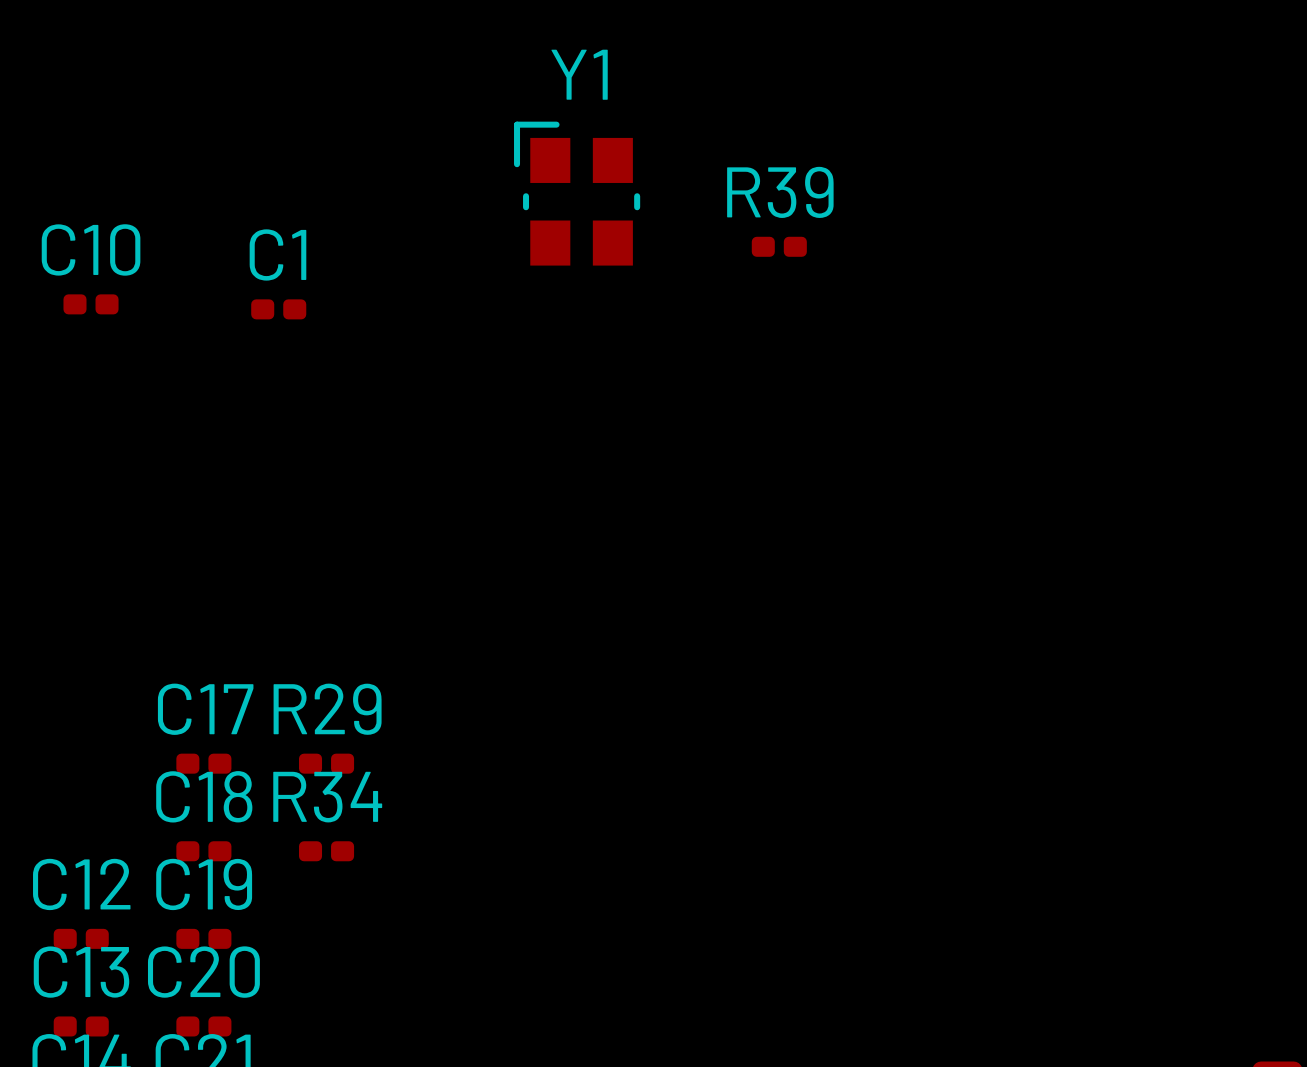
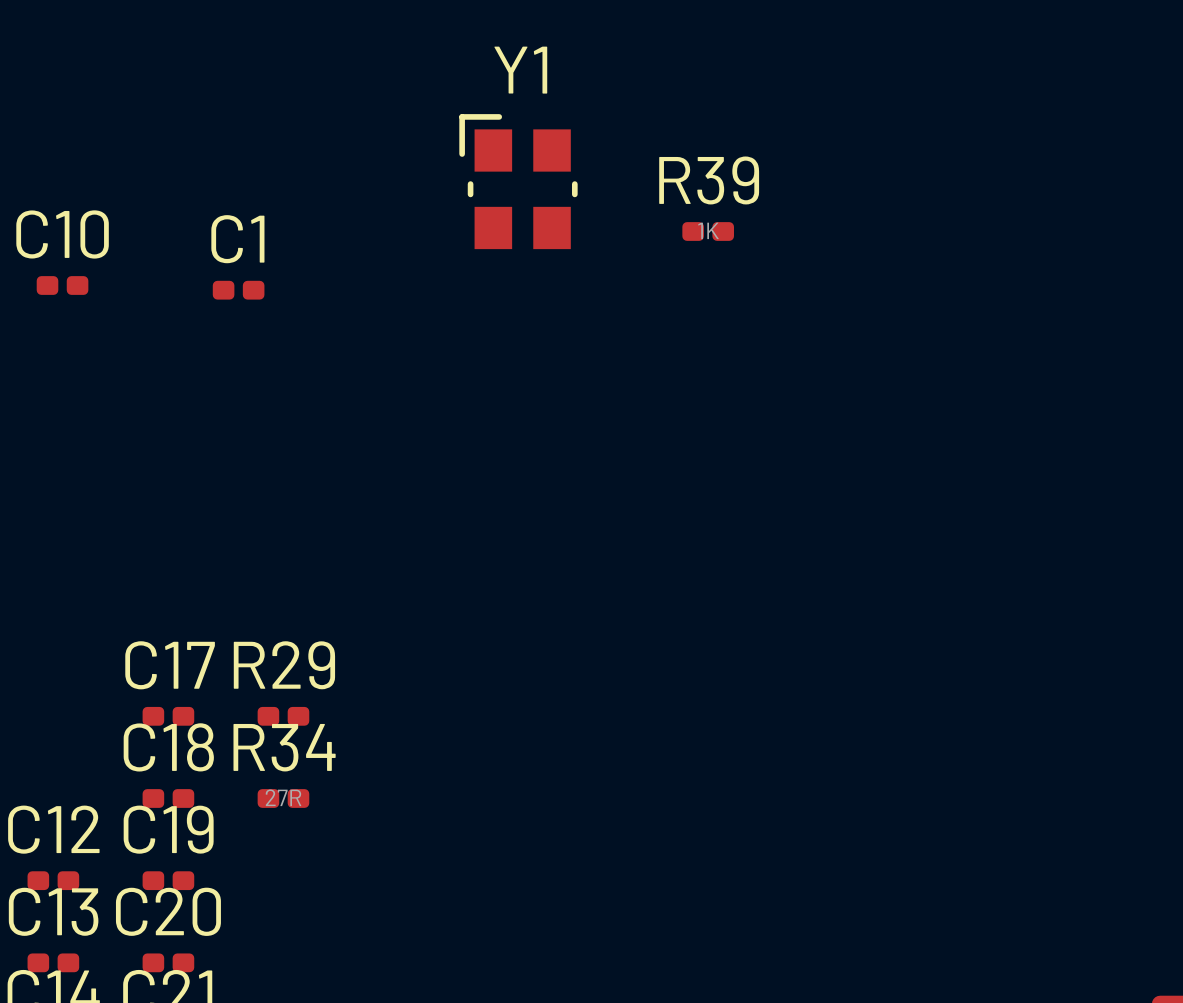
R39 value: none -> 1K (708, 230)
R34 value: none -> 27R (283, 797)

